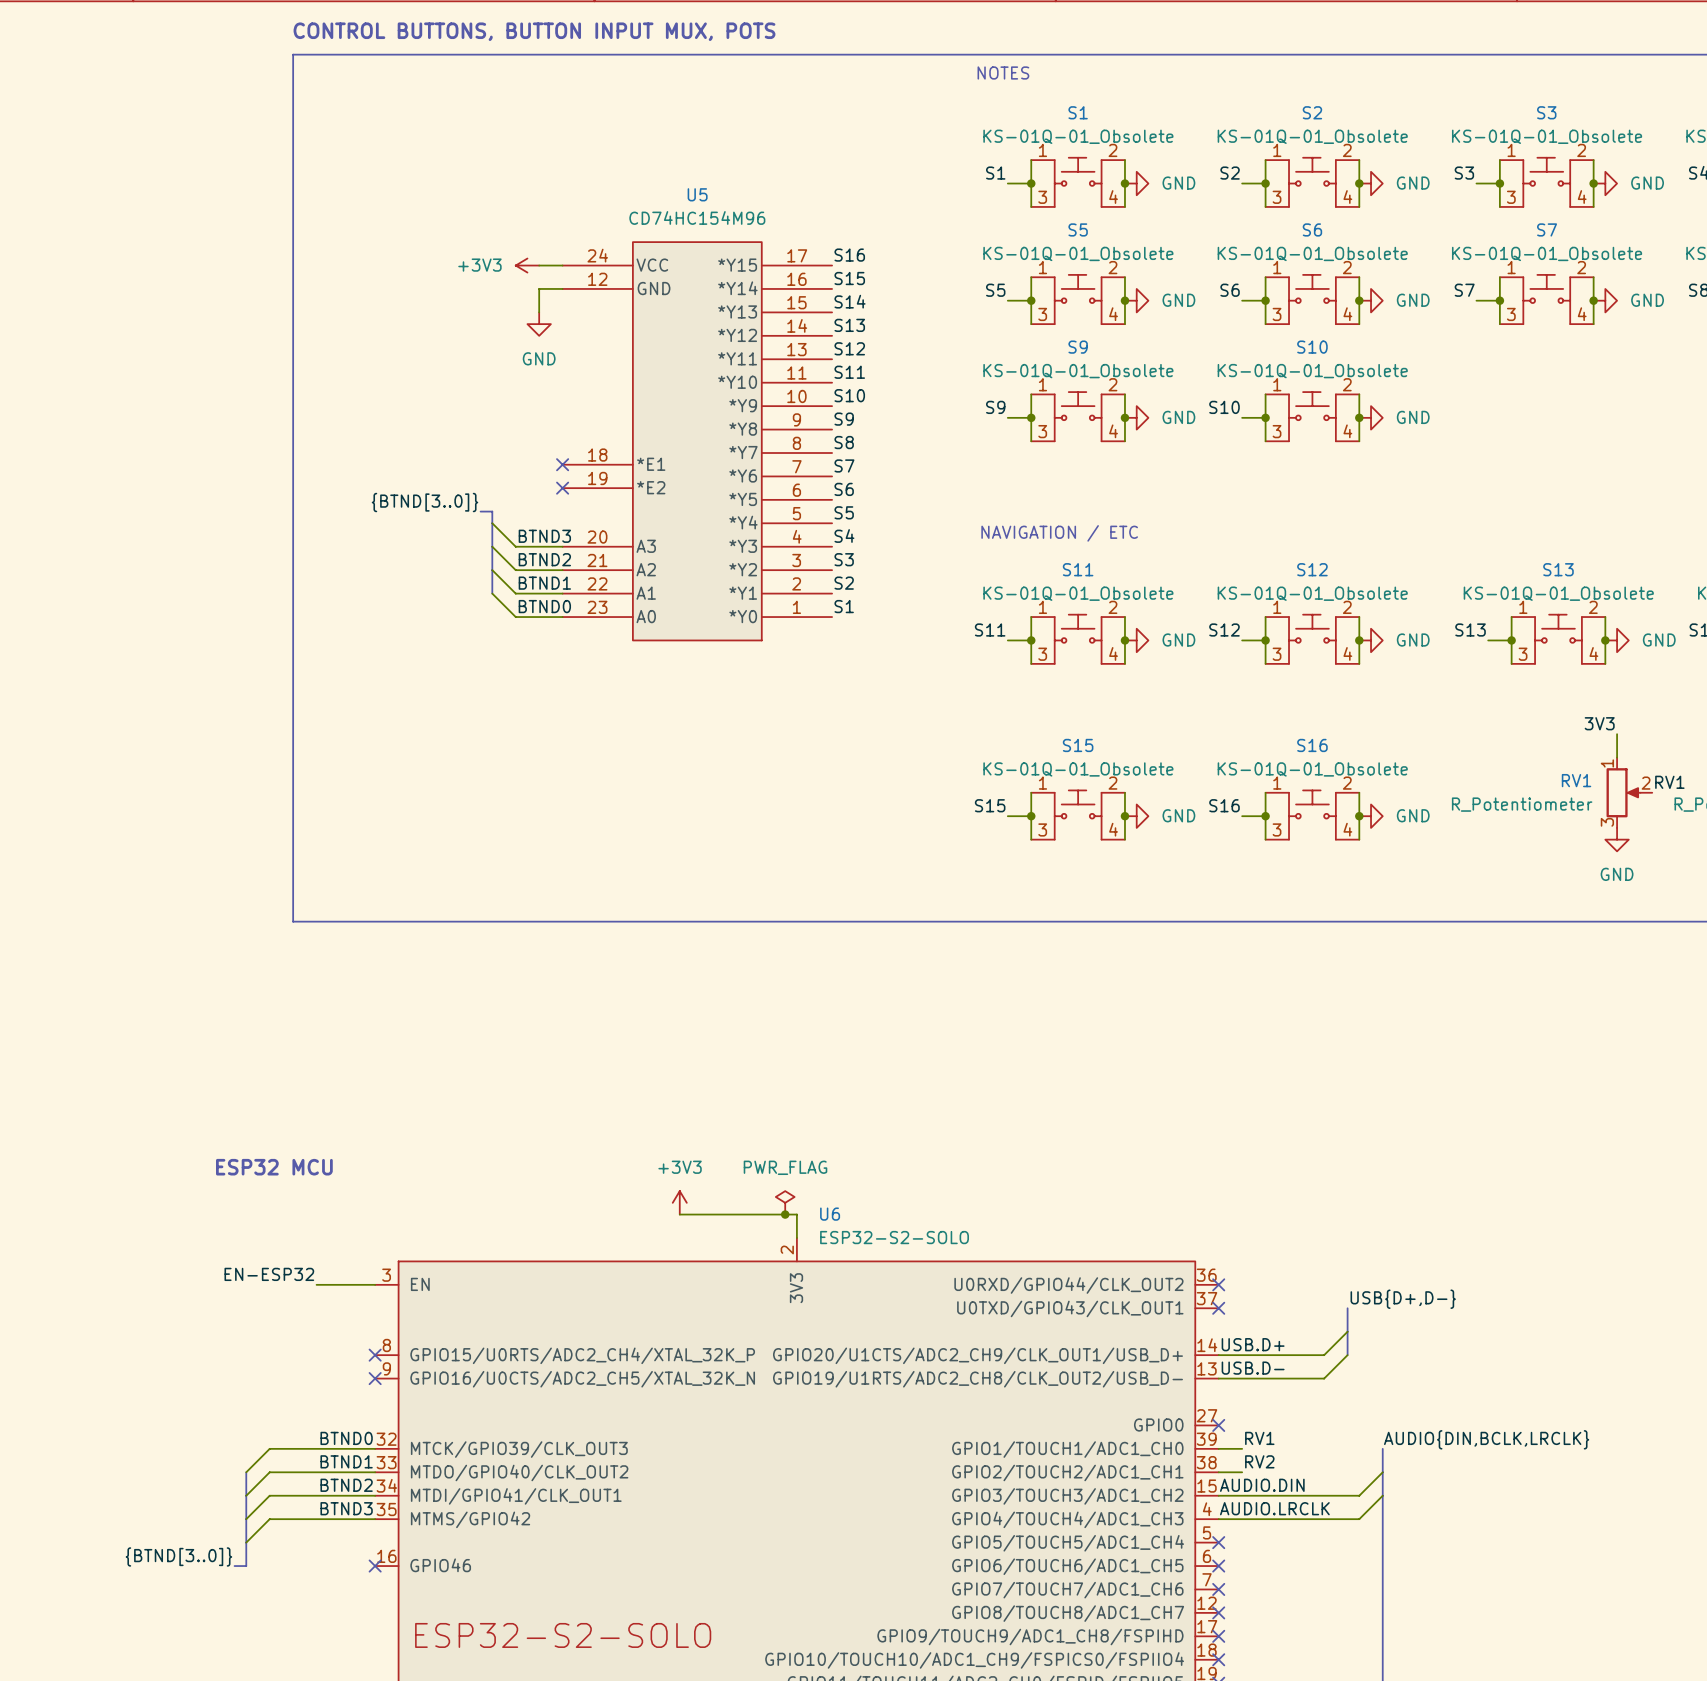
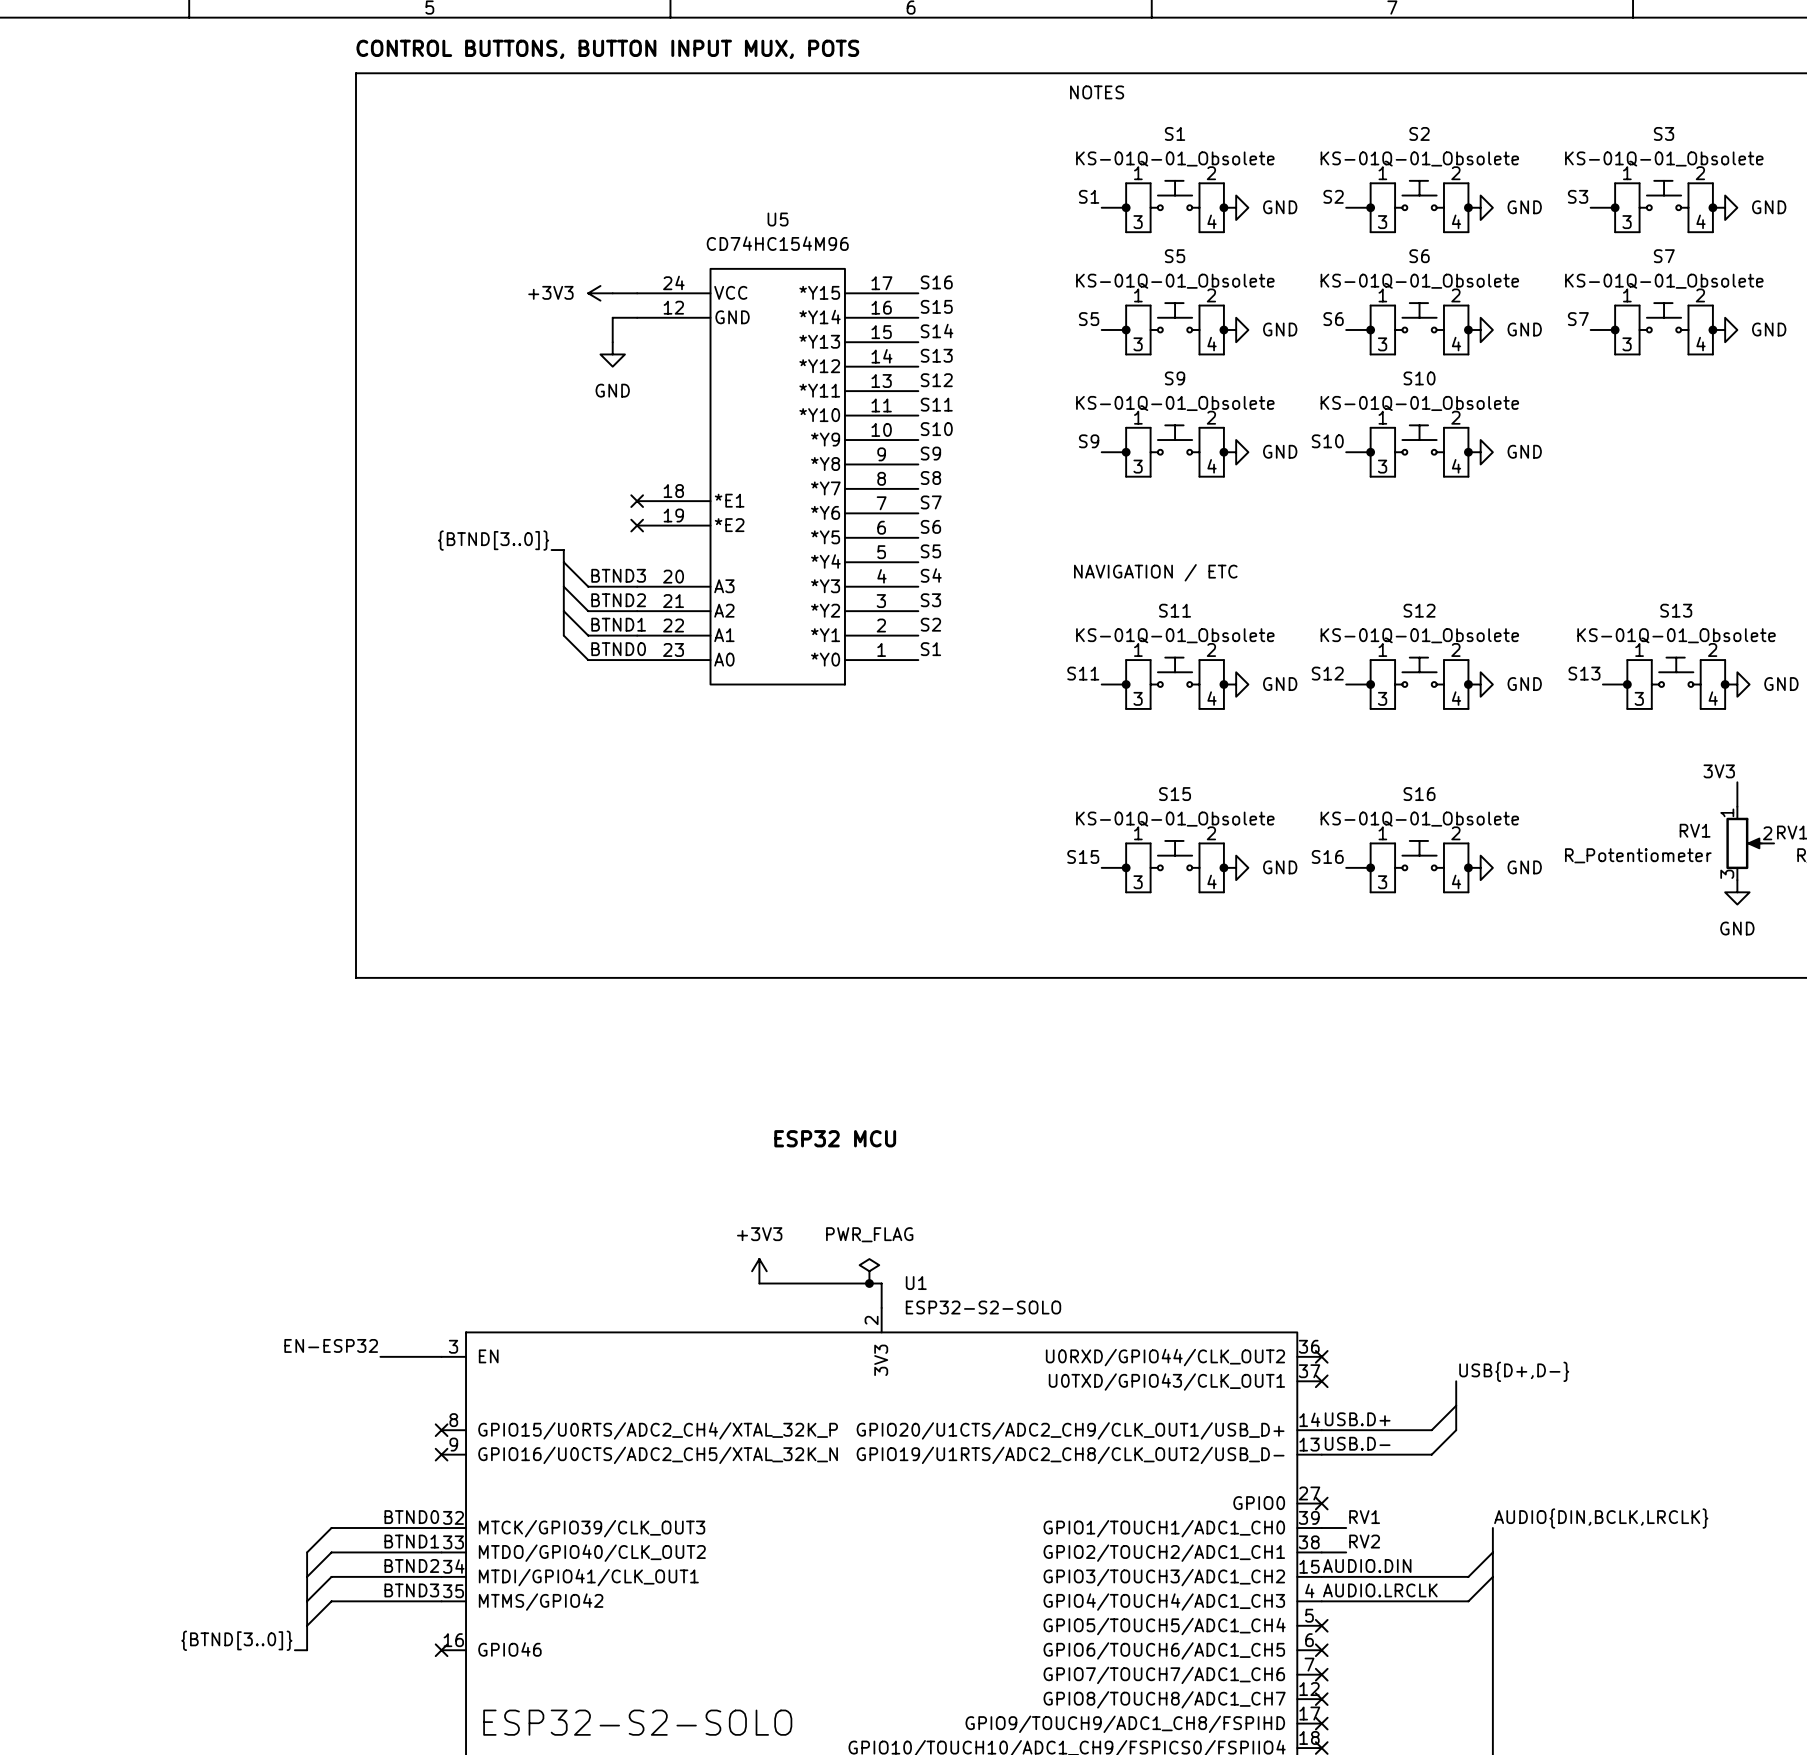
text: none -> ESP32 MCU (835, 1138)
text: ESP32 MCU (274, 1167) -> none
U6 name: U6 (830, 1214) -> U1 (916, 1283)

